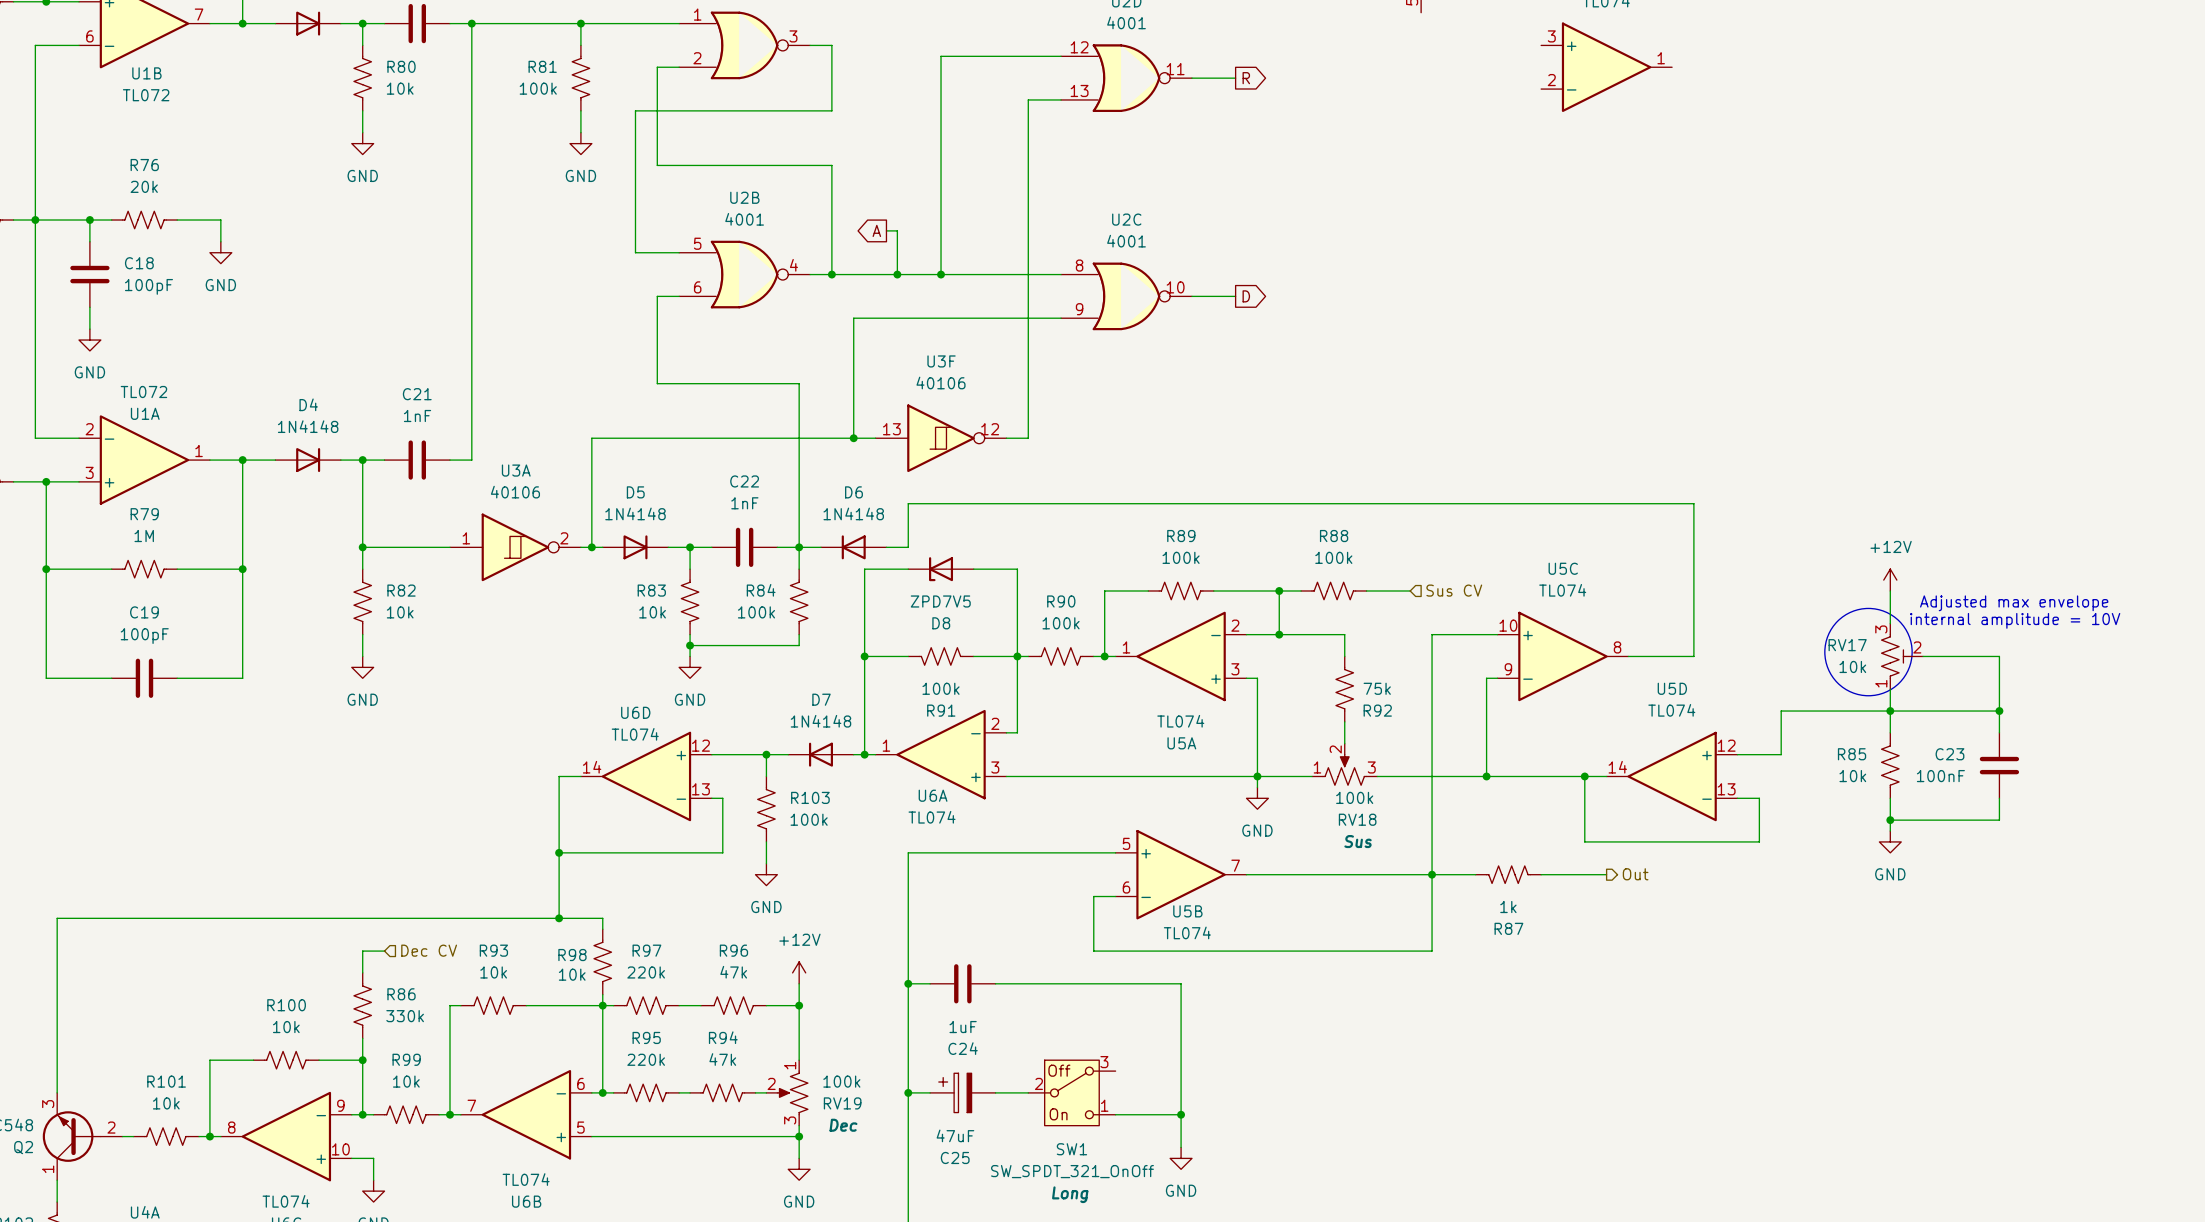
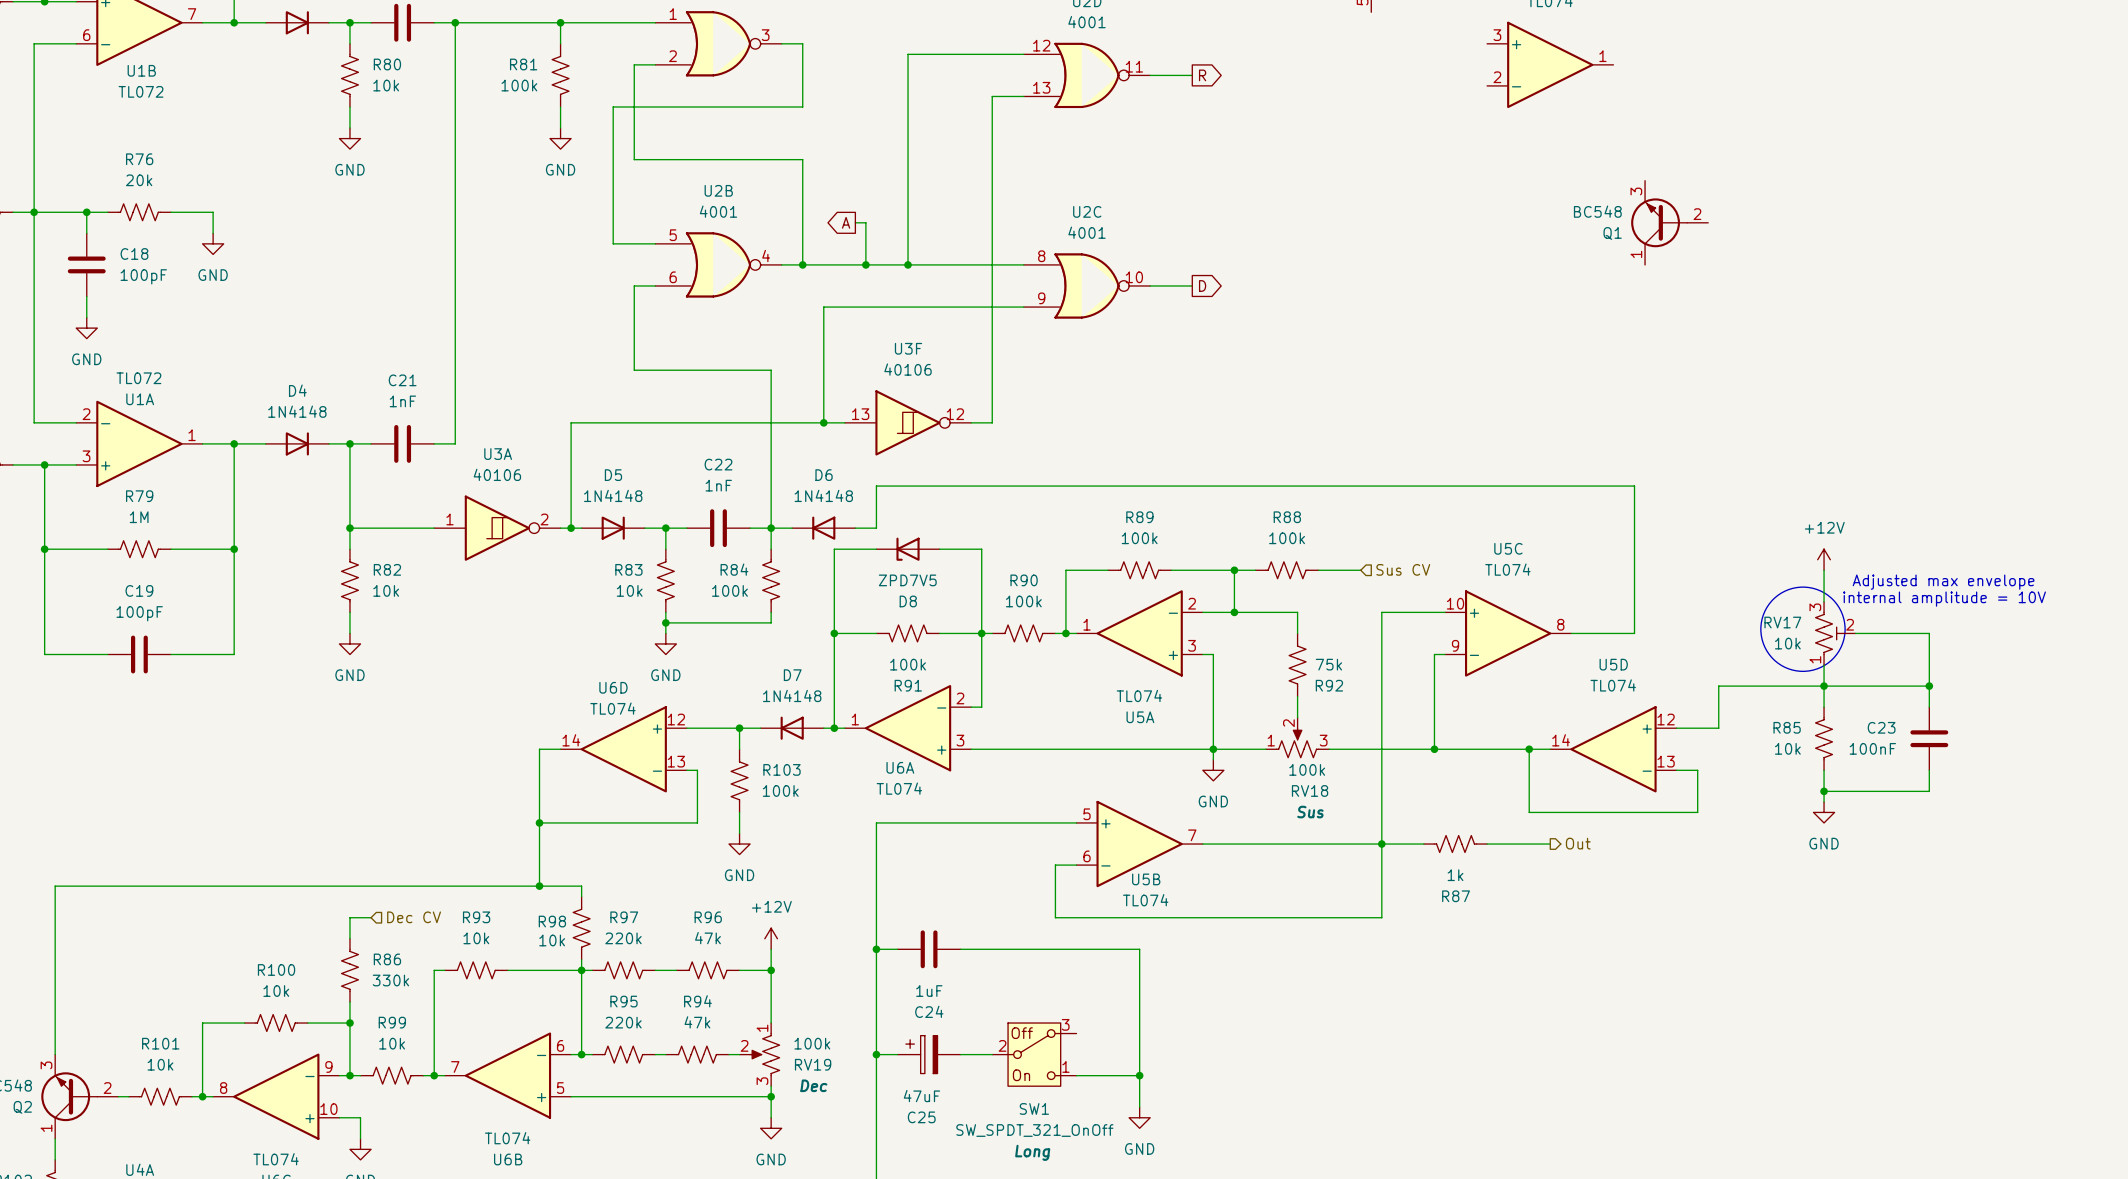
Q1: none -> BC548 (1669, 222)

